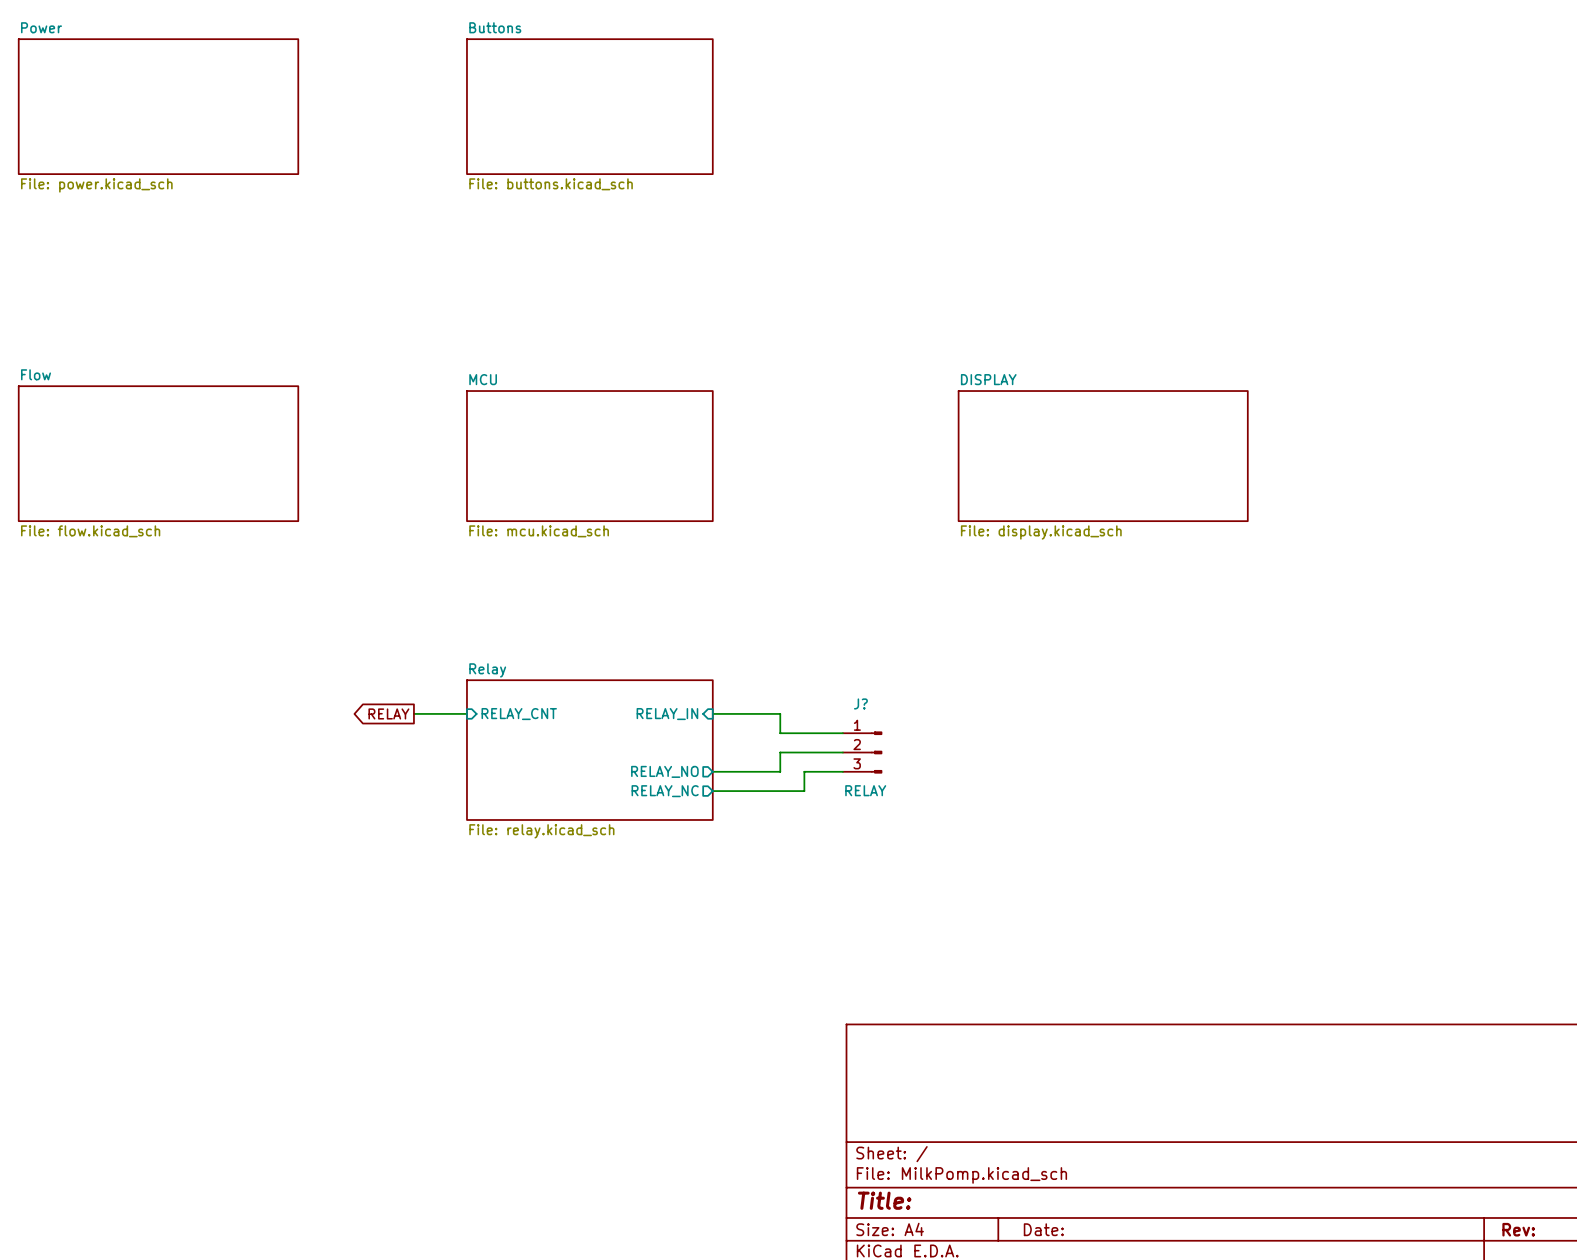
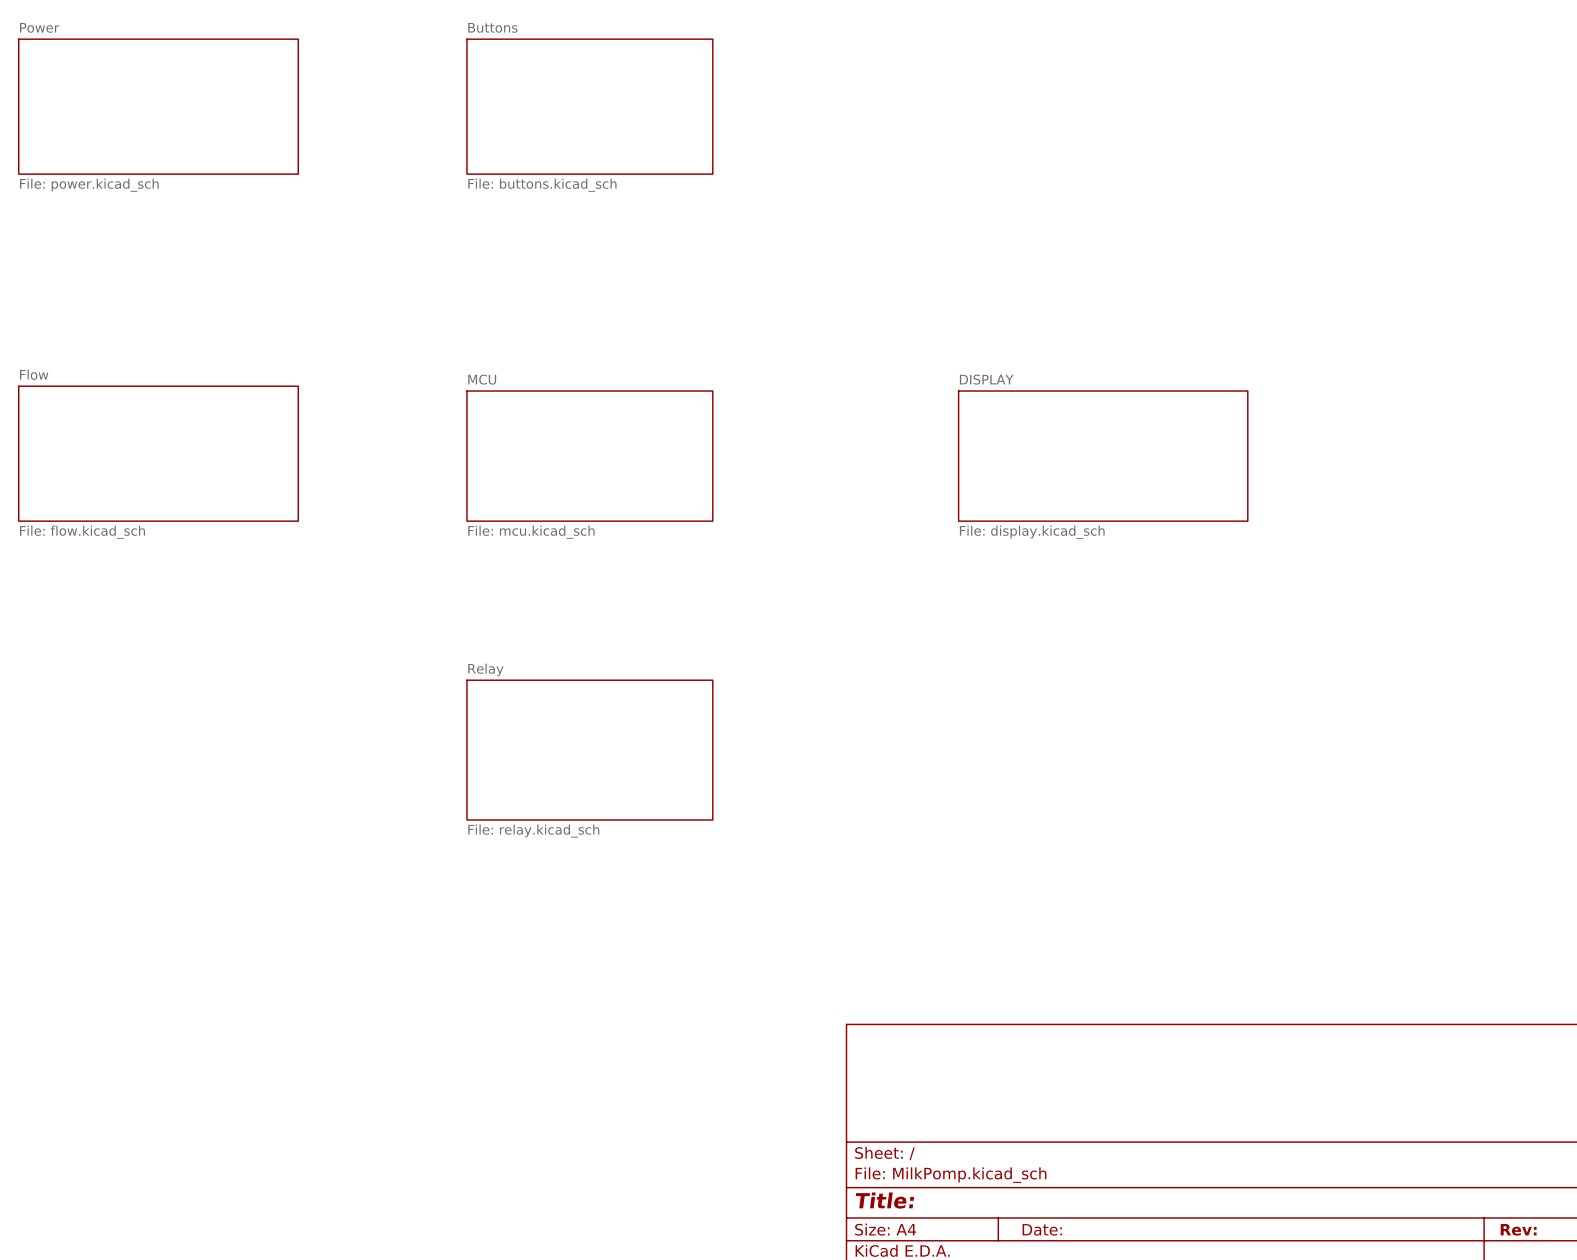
global label: RELAY (388, 713) -> none
wire: (413, 713) (466, 713) -> none
wire: (712, 713) (780, 713) (780, 733) (842, 733) -> none
sheet pin: RELAY_CNT (519, 714) -> none
sheet pin: RELAY_IN (667, 714) -> none
wire: (842, 752) (780, 752) (780, 771) (712, 771) -> none
J?: RELAY (862, 752) -> none
sheet pin: RELAY_NO (664, 771) -> none
wire: (842, 771) (804, 771) (804, 791) (712, 791) -> none
sheet pin: RELAY_NC (665, 791) -> none

